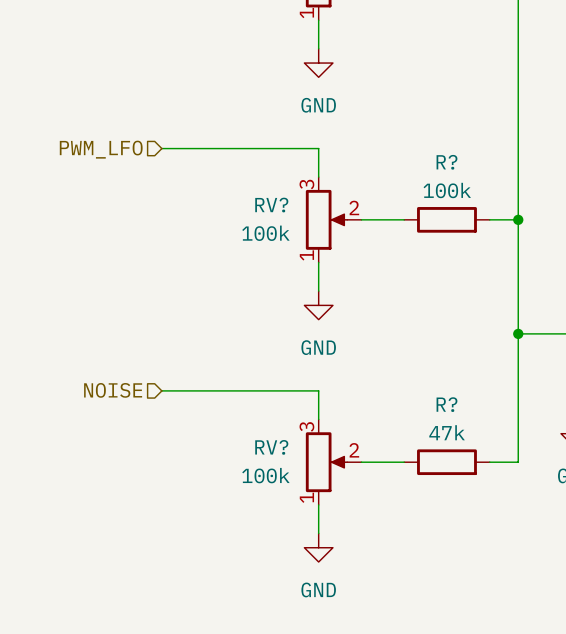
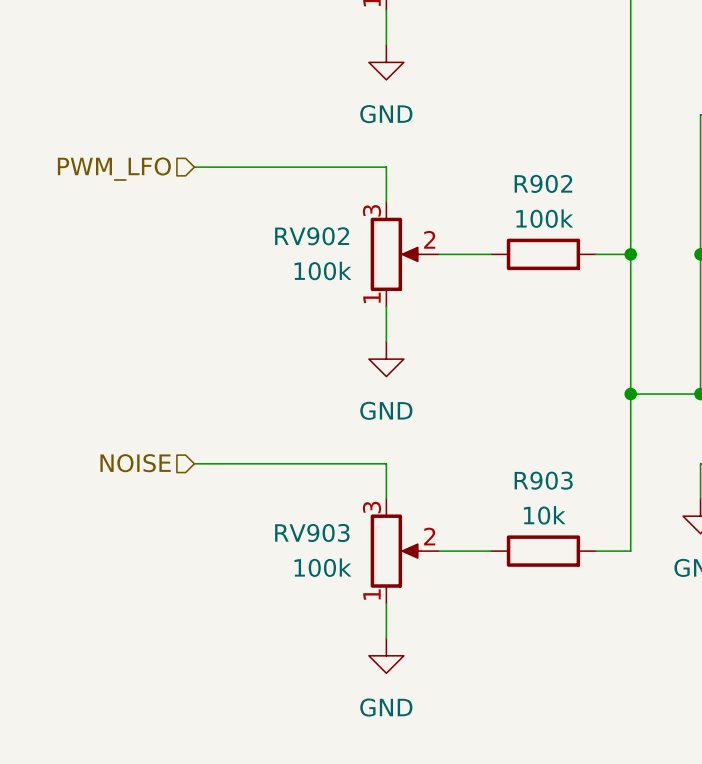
R? name: R? (446, 162) -> R902 (543, 183)
RV? name: RV? (271, 205) -> RV902 (312, 236)
R? name: R? (446, 404) -> R903 (543, 480)
R? value: 47k (447, 432) -> 10k (544, 515)
RV? name: RV? (271, 447) -> RV903 (312, 533)

